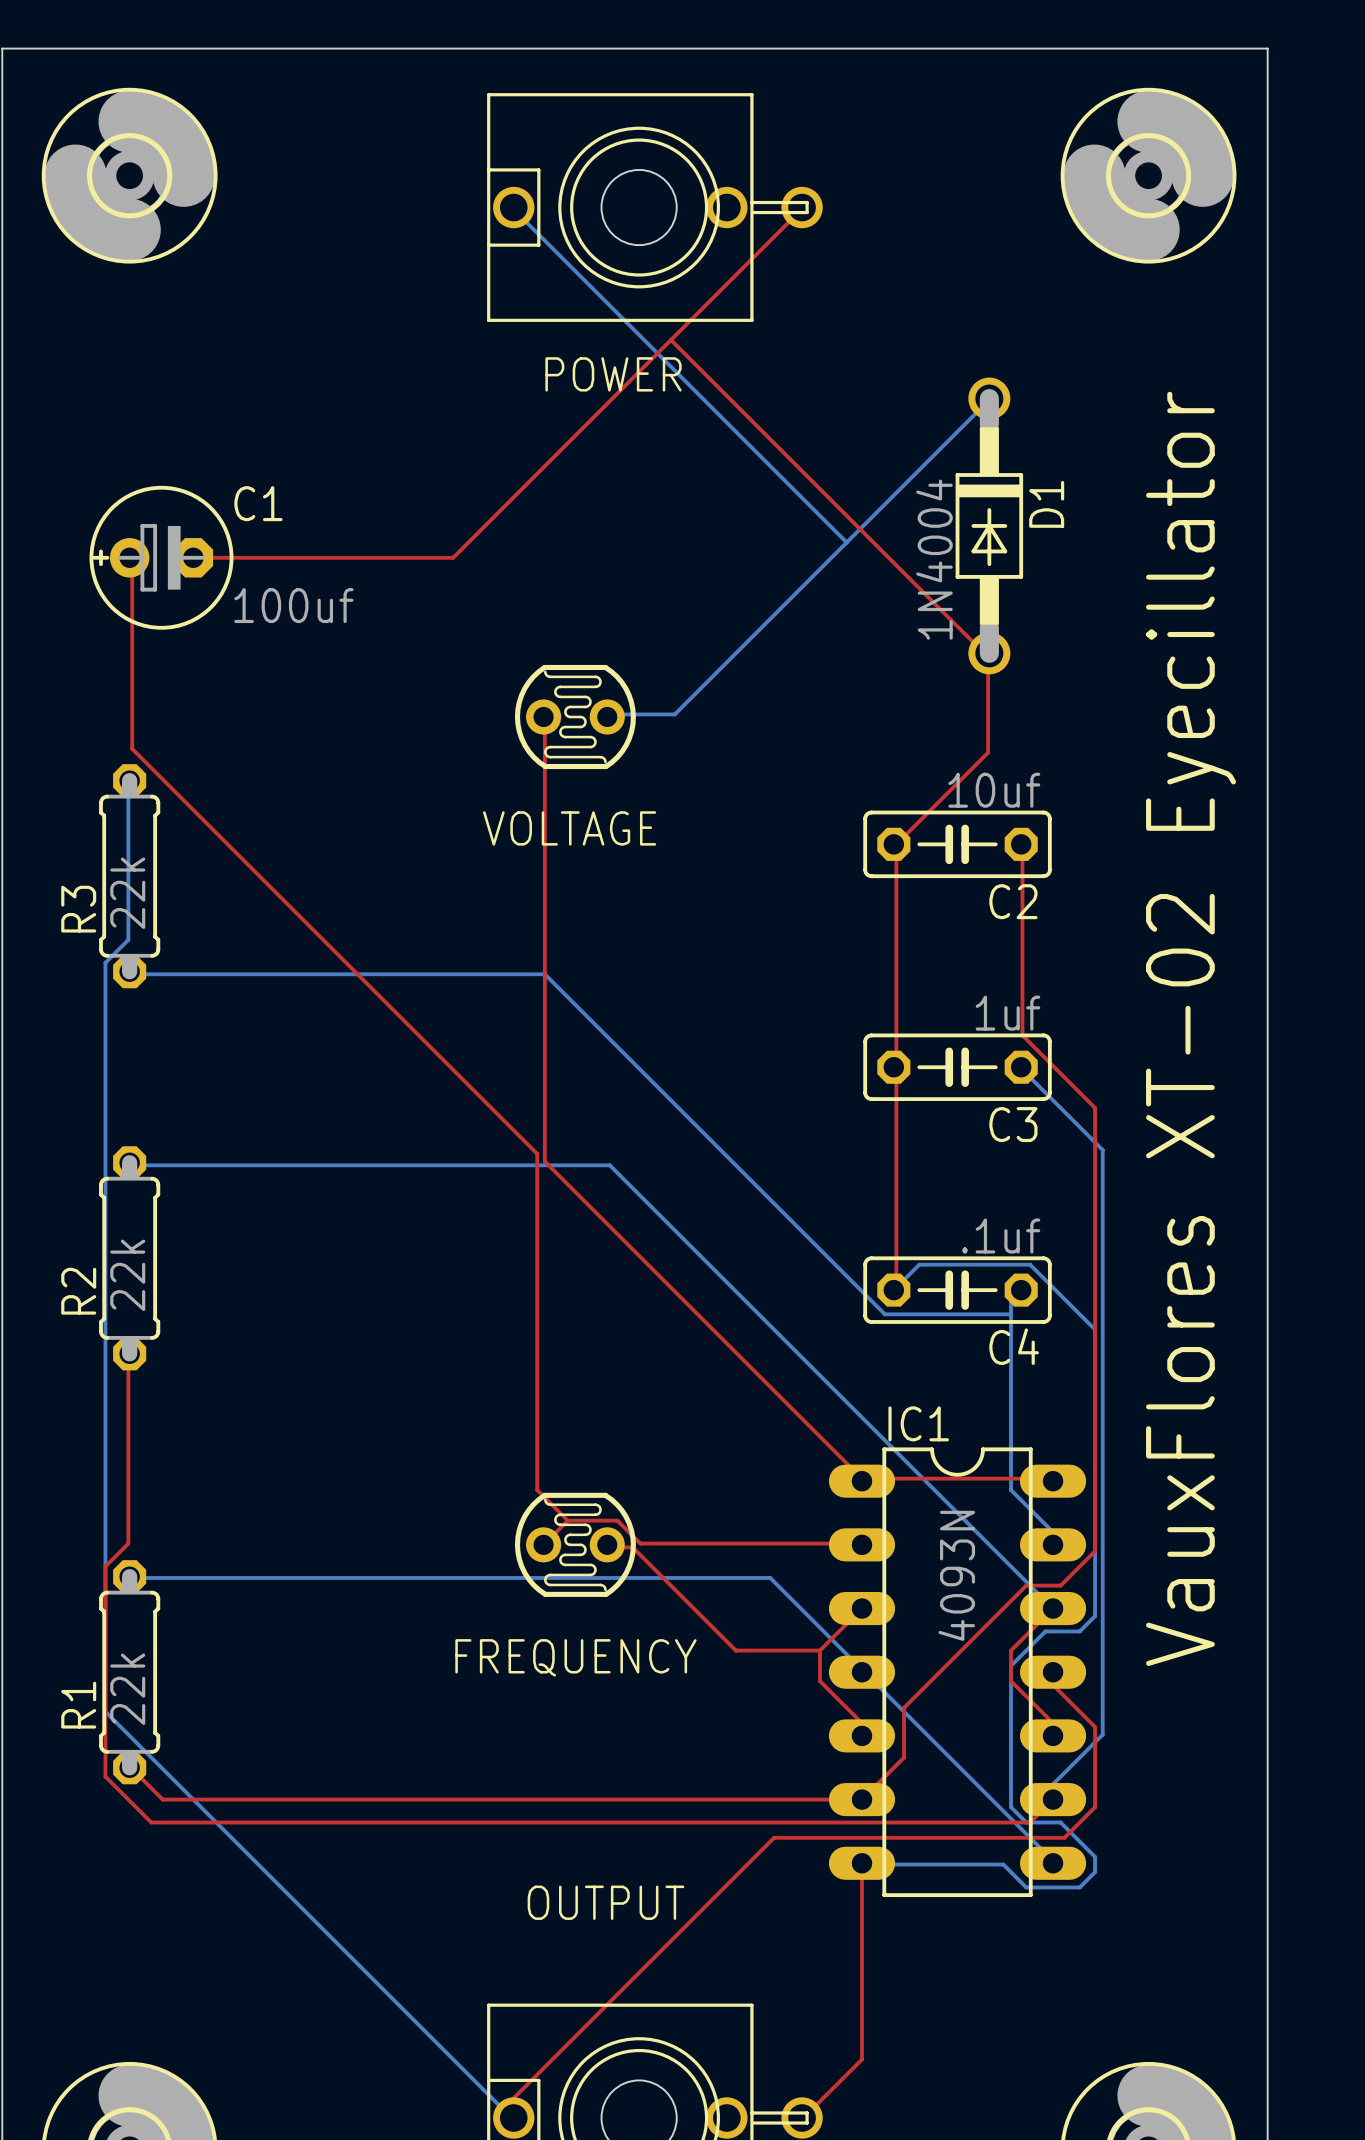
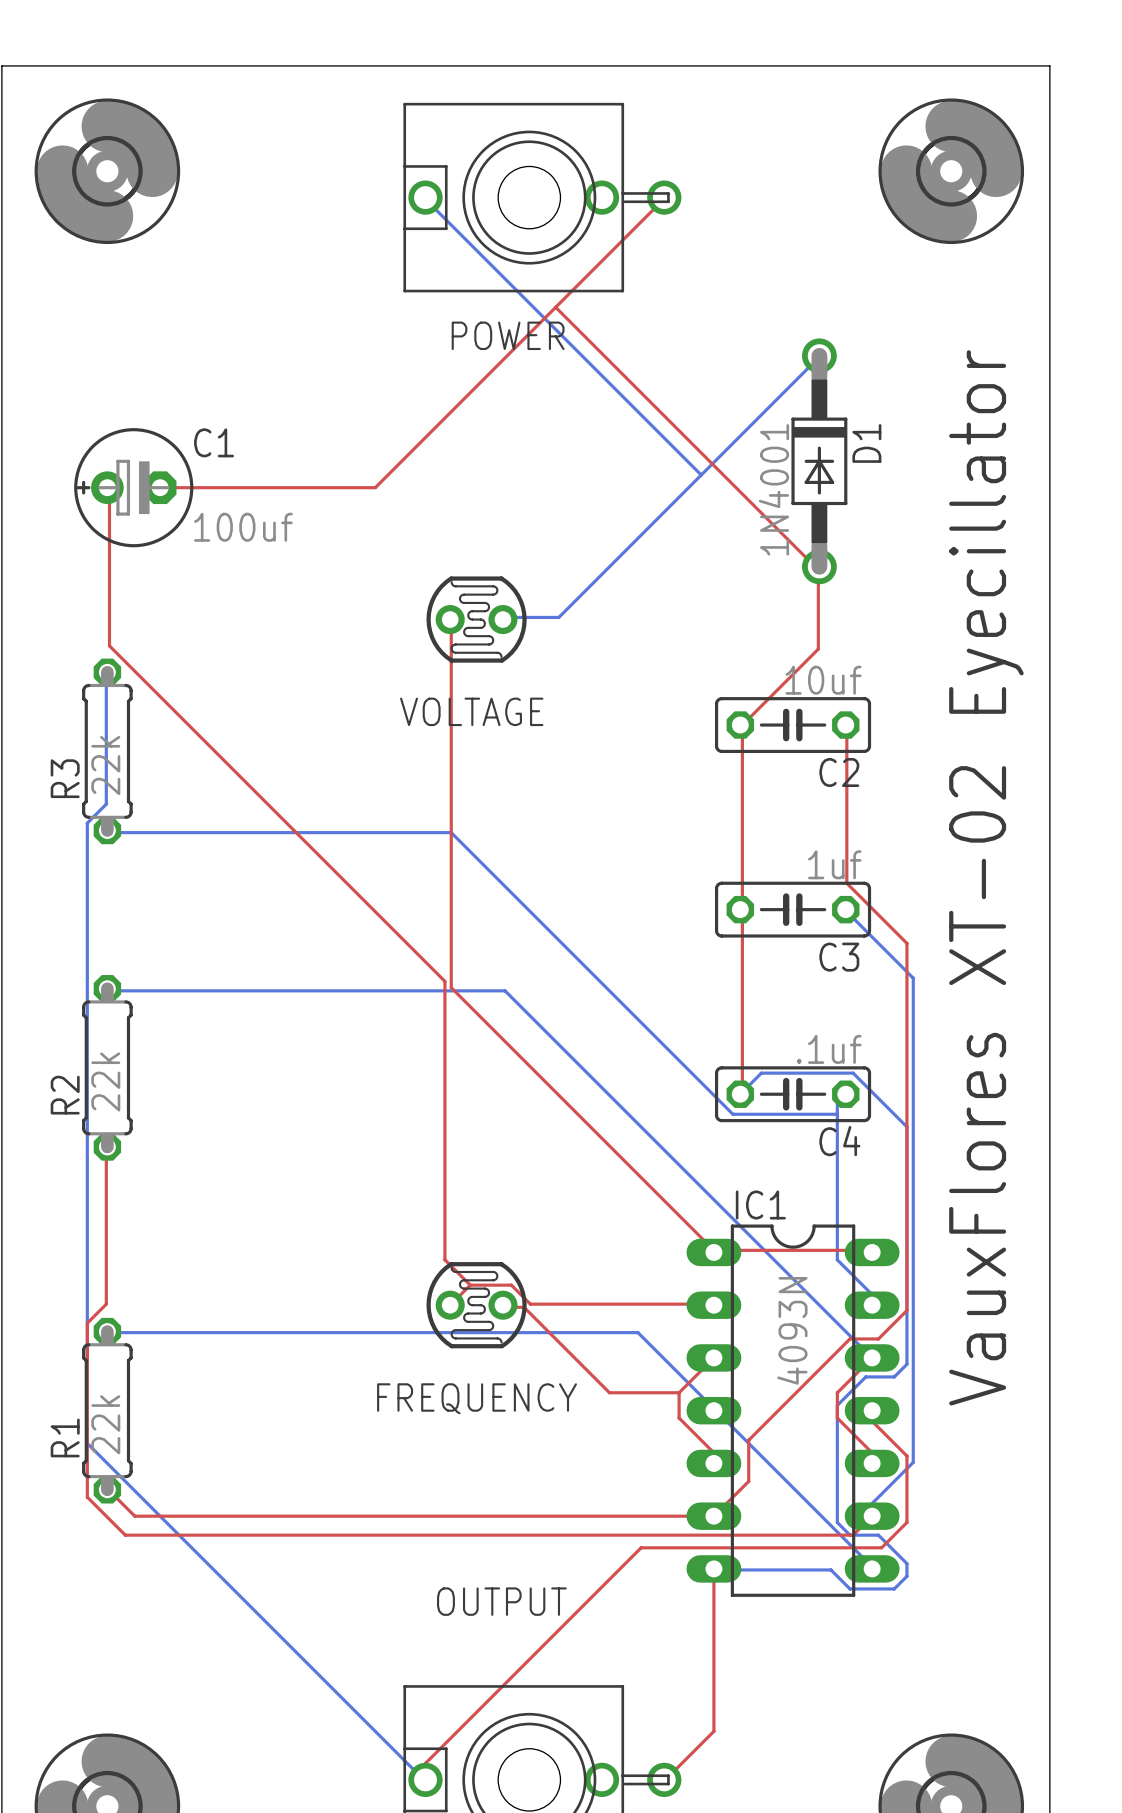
D1 value: 1N4004 (934, 559) -> 1N4001 (773, 489)

